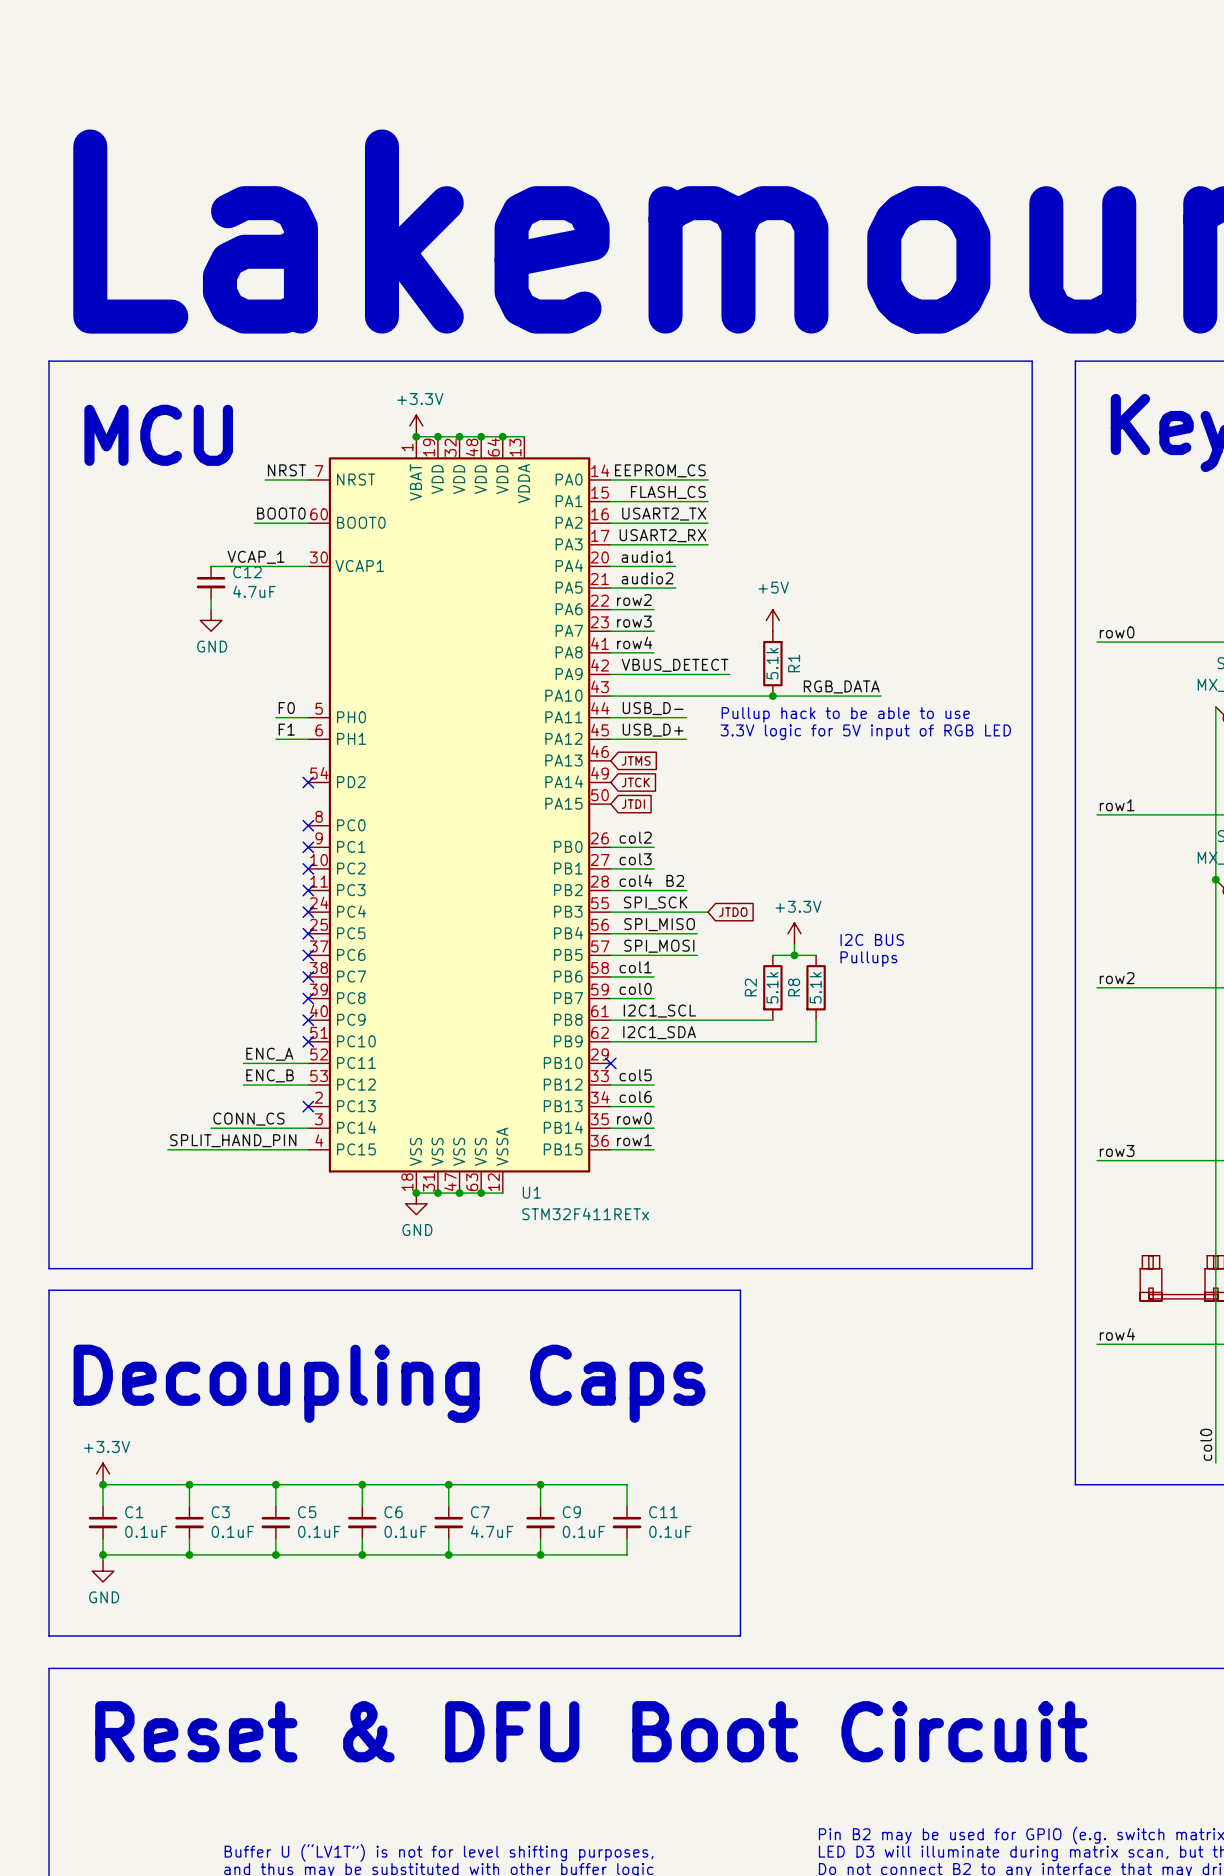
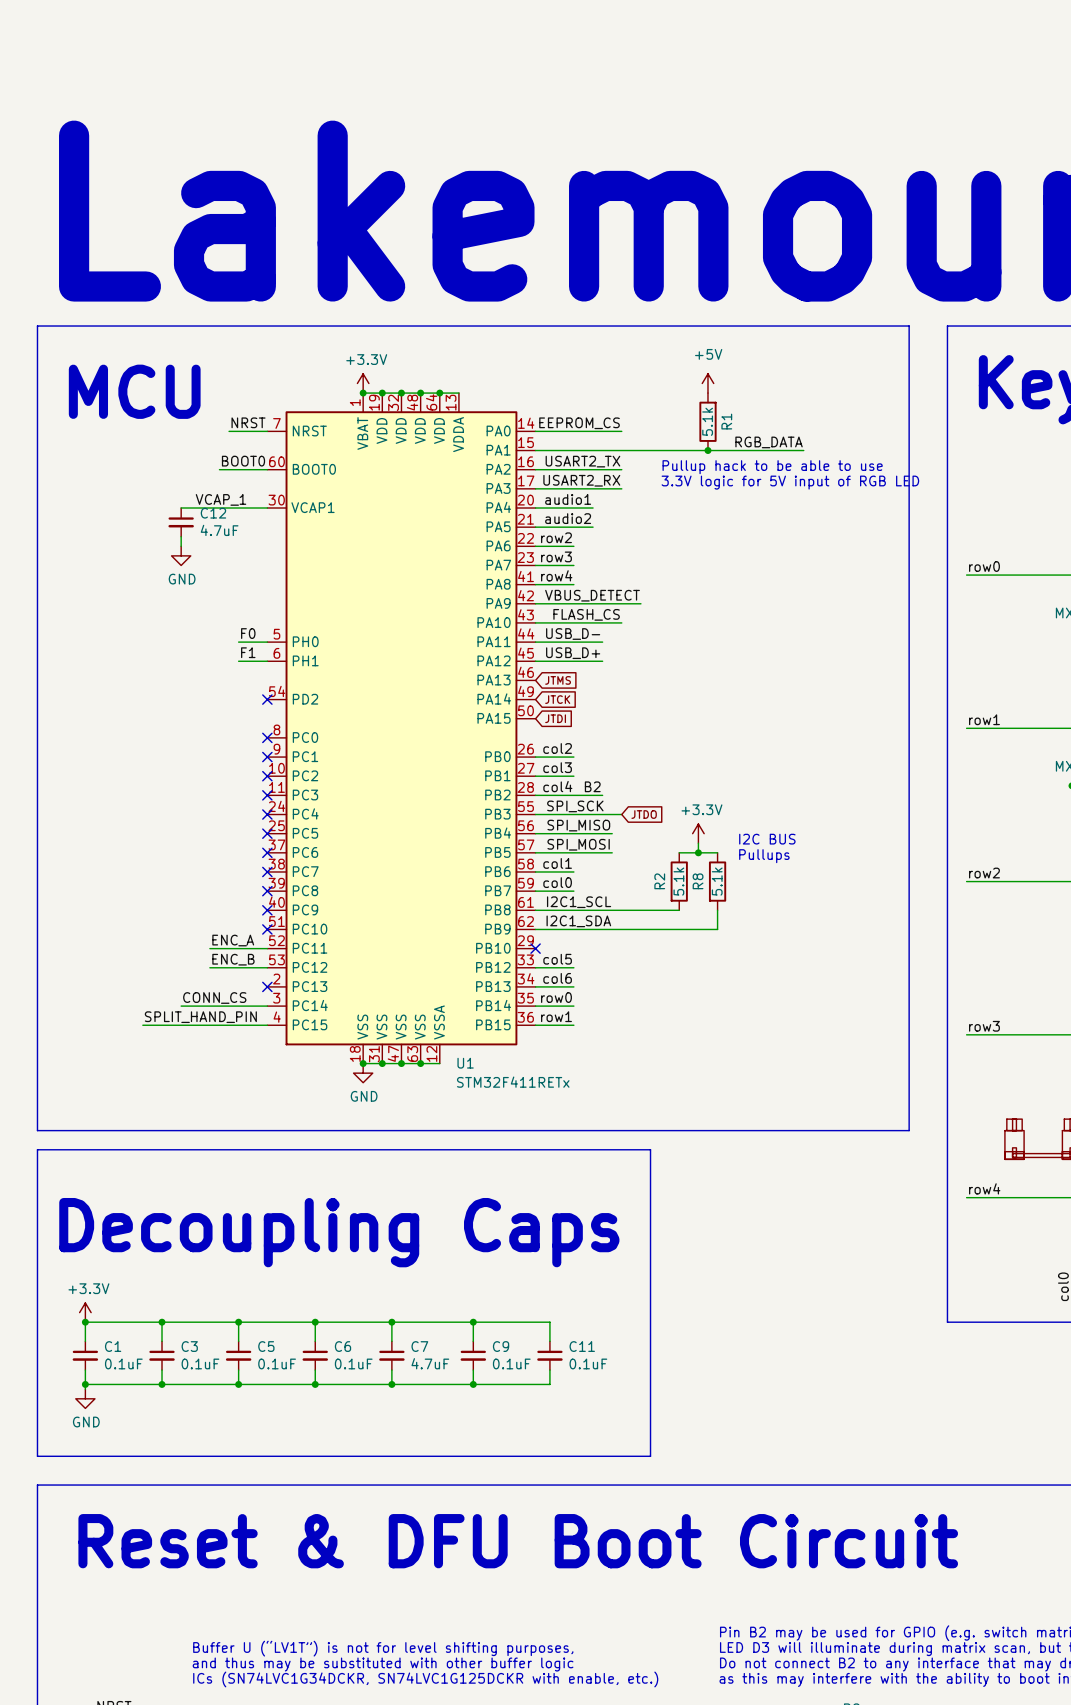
label position: FLASH_CS (668, 492) -> FLASH_CS (586, 614)
wire: none -> (621, 450) (803, 450)
junction: none -> (707, 450)
power symbol position: +5V (772, 620) -> +5V (707, 383)
R1 position: (772, 663) -> (707, 421)
label position: RGB_DATA (841, 686) -> RGB_DATA (769, 442)
wire: (708, 696) (880, 696) -> none
junction: (772, 696) -> none
text position: Pullup hack to be able to use (845, 714) -> Pullup hack to be able to use (772, 467)
text position: 3.3V logic for 5V input of RGB LED (865, 732) -> 3.3V logic for 5V input of RGB LED (790, 482)

